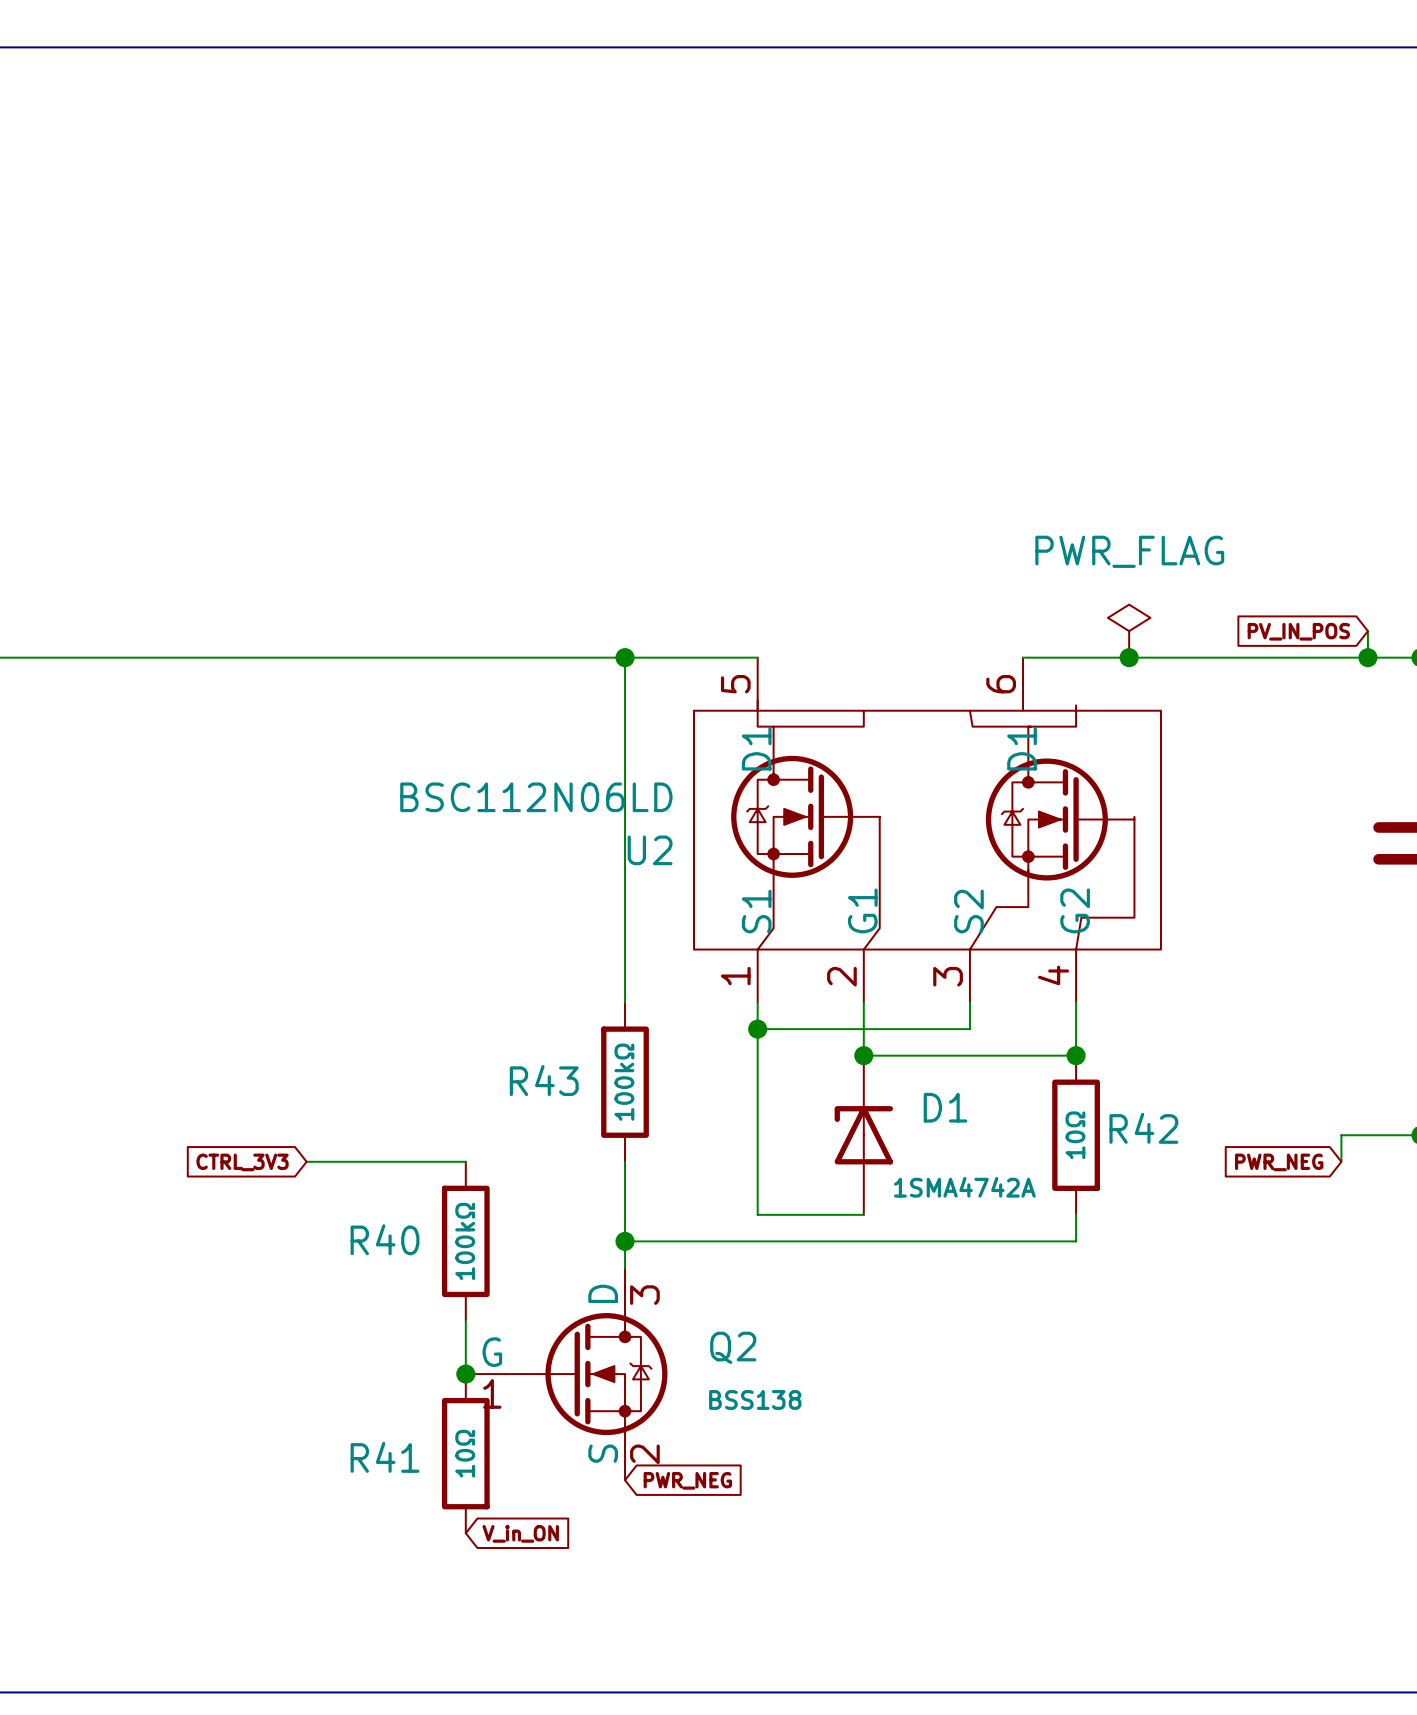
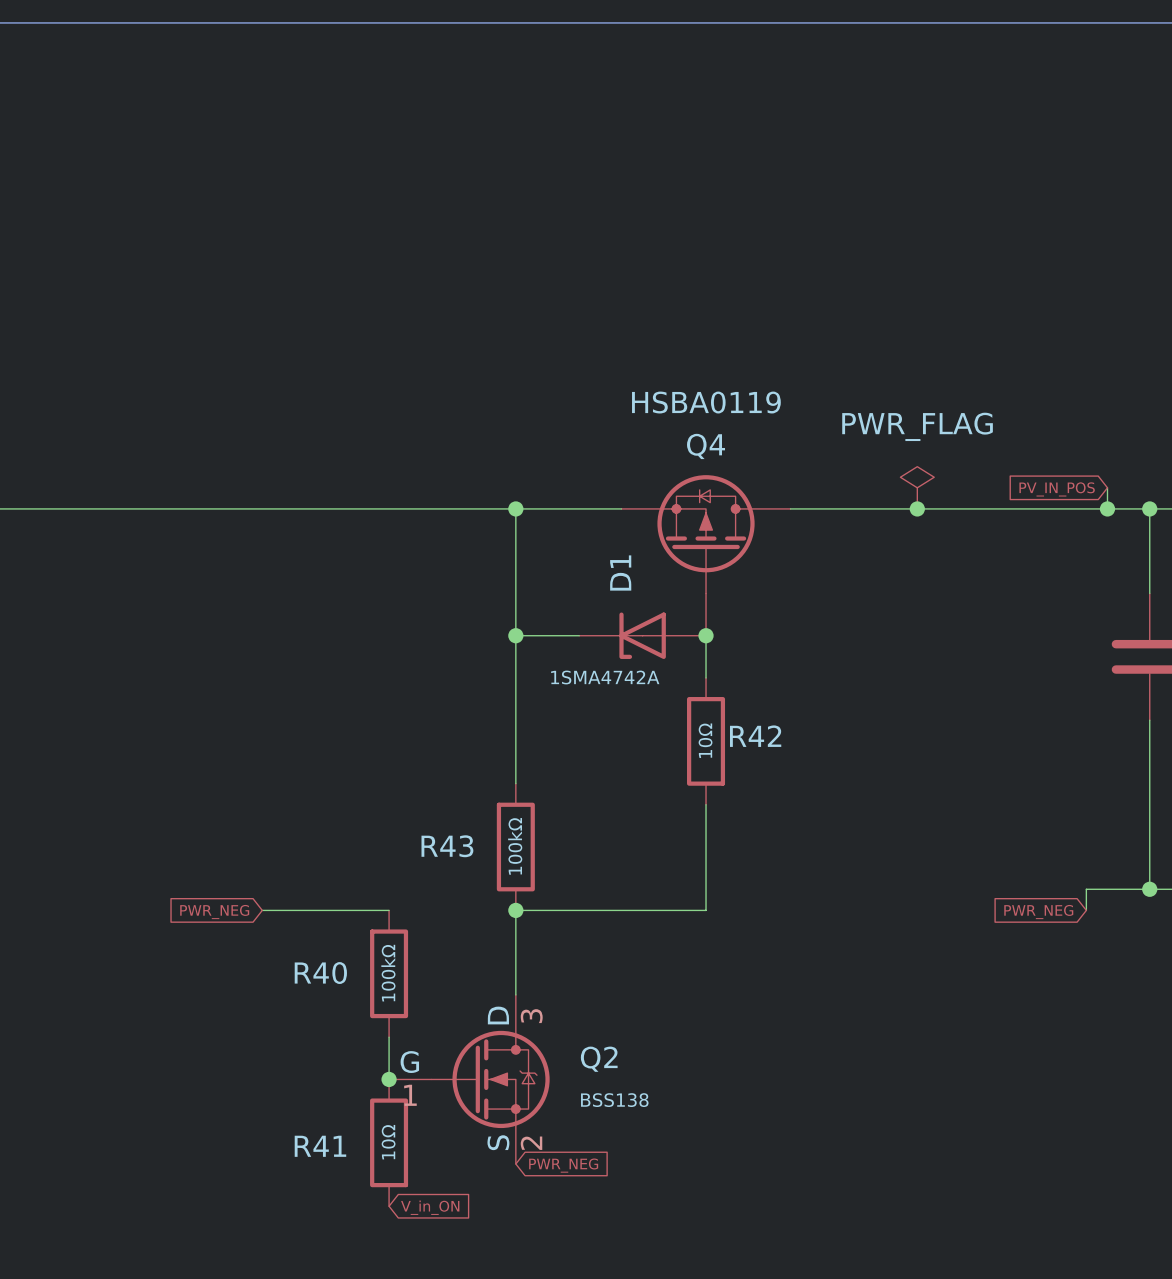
wire: none -> (790, 508) (832, 508)
Q4: none -> HSBA0119 (706, 555)
wire: none -> (515, 635) (579, 635)
junction: none -> (515, 635)
wire: none -> (706, 635) (706, 677)
junction: none -> (706, 635)
U2: BSC112N06LD (927, 830) -> none
wire: (757, 1002) (757, 1214) (863, 1214) -> none
wire: (969, 1002) (969, 1029) (757, 1029) -> none
wire: (1076, 1002) (1076, 1055) (863, 1055) -> (515, 910) (706, 910) (706, 825)
junction: (757, 1029) -> none
junction: (863, 1055) -> none
junction: (1076, 1055) -> none
D1 rotation: 0° (863, 1135) -> 90° counterclockwise (642, 635)
D1 position: (863, 1135) -> (642, 635)
R42 position: (1076, 1135) -> (706, 741)
global label: CTRL_3V3 (242, 1162) -> PWR_NEG (214, 912)
D1 value position: 1SMA4742A (964, 1187) -> 1SMA4742A (605, 677)
wire: (1076, 1214) (1076, 1241) (625, 1241) -> none
junction position: (625, 1241) -> (515, 910)

